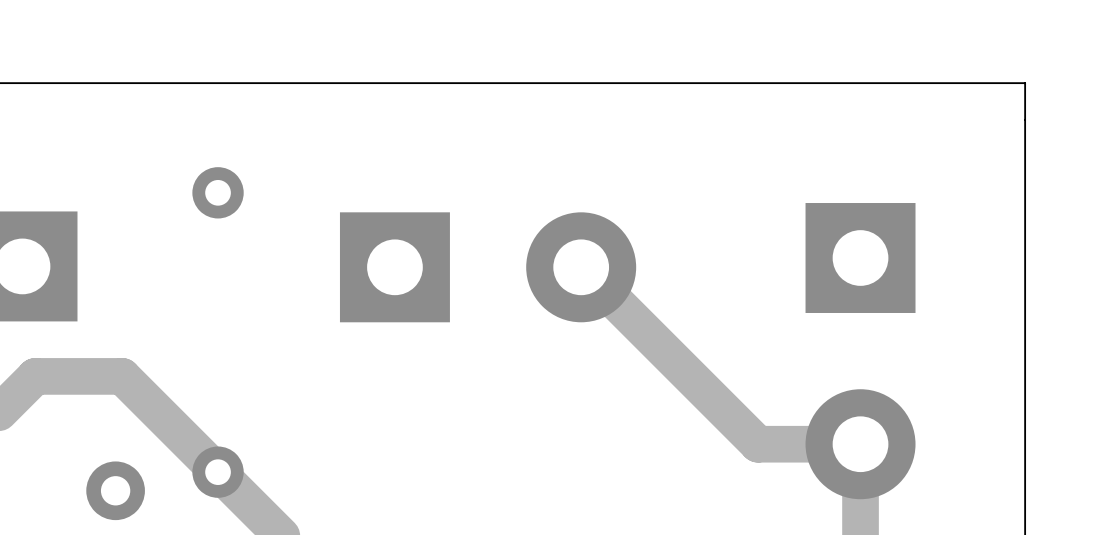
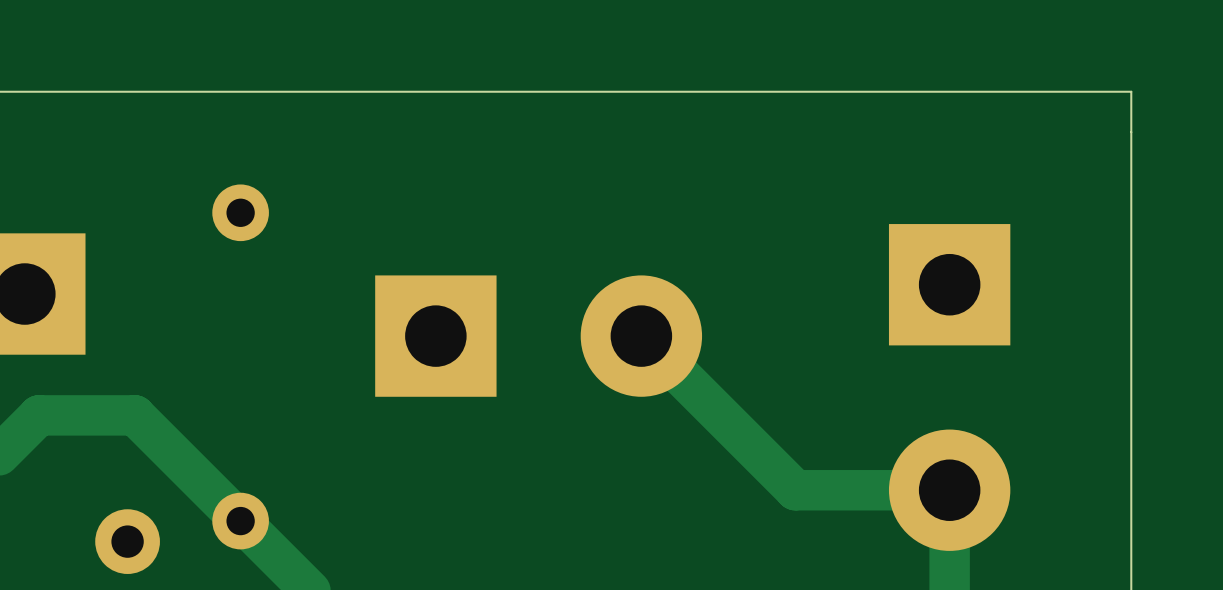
part position: (488, 267) -> (538, 336)
track: (581, 267) (758, 444) -> (641, 336) (795, 490) (836, 490)

